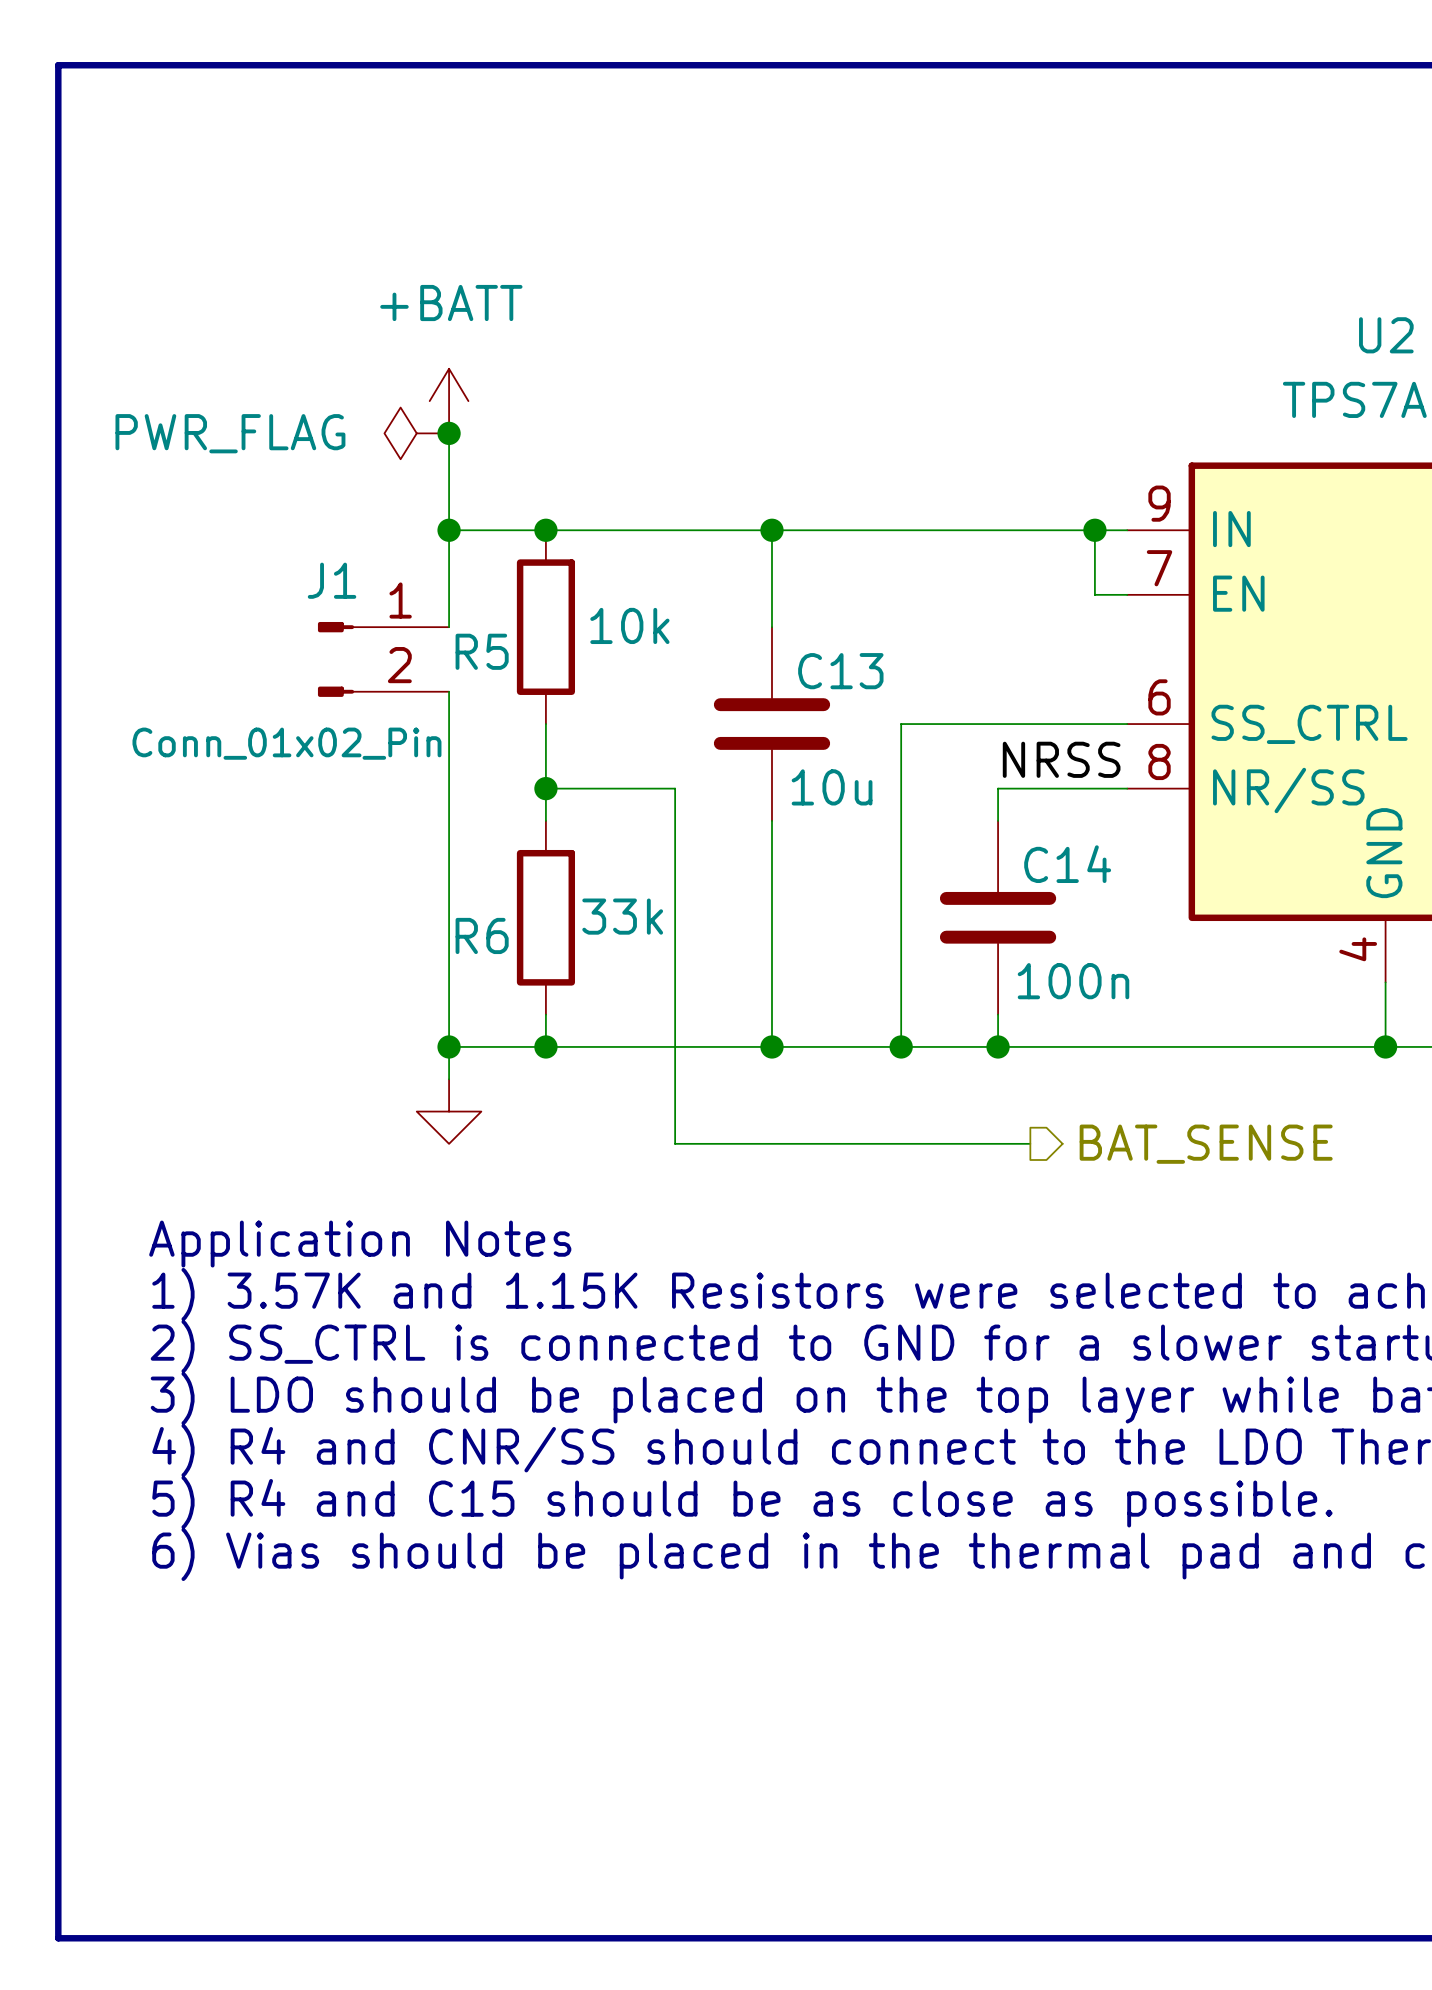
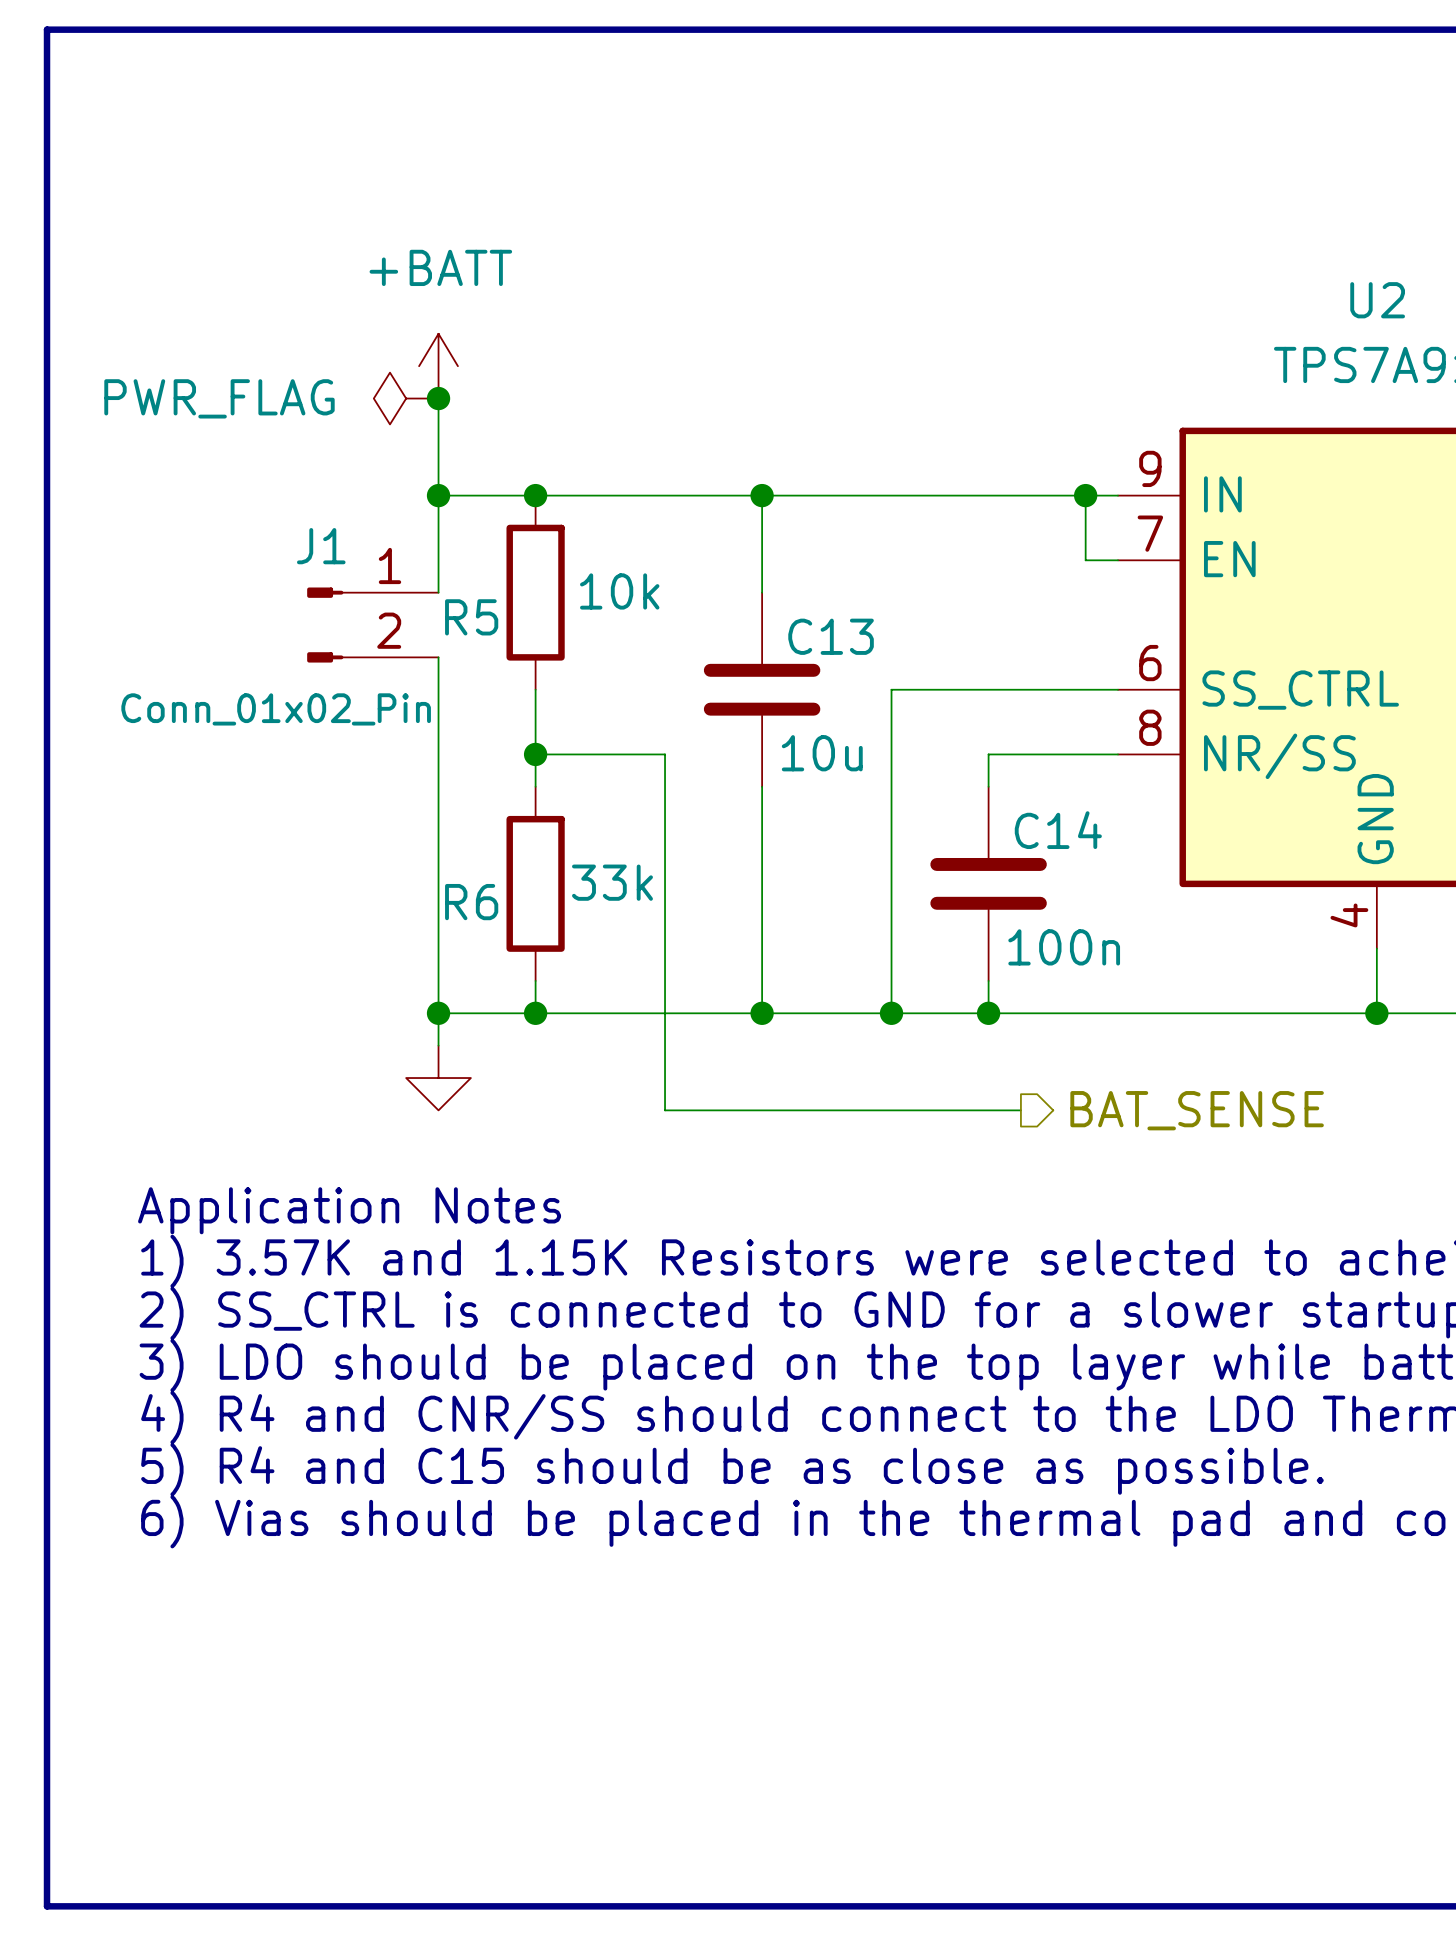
label: NRSS (1061, 759) -> none

